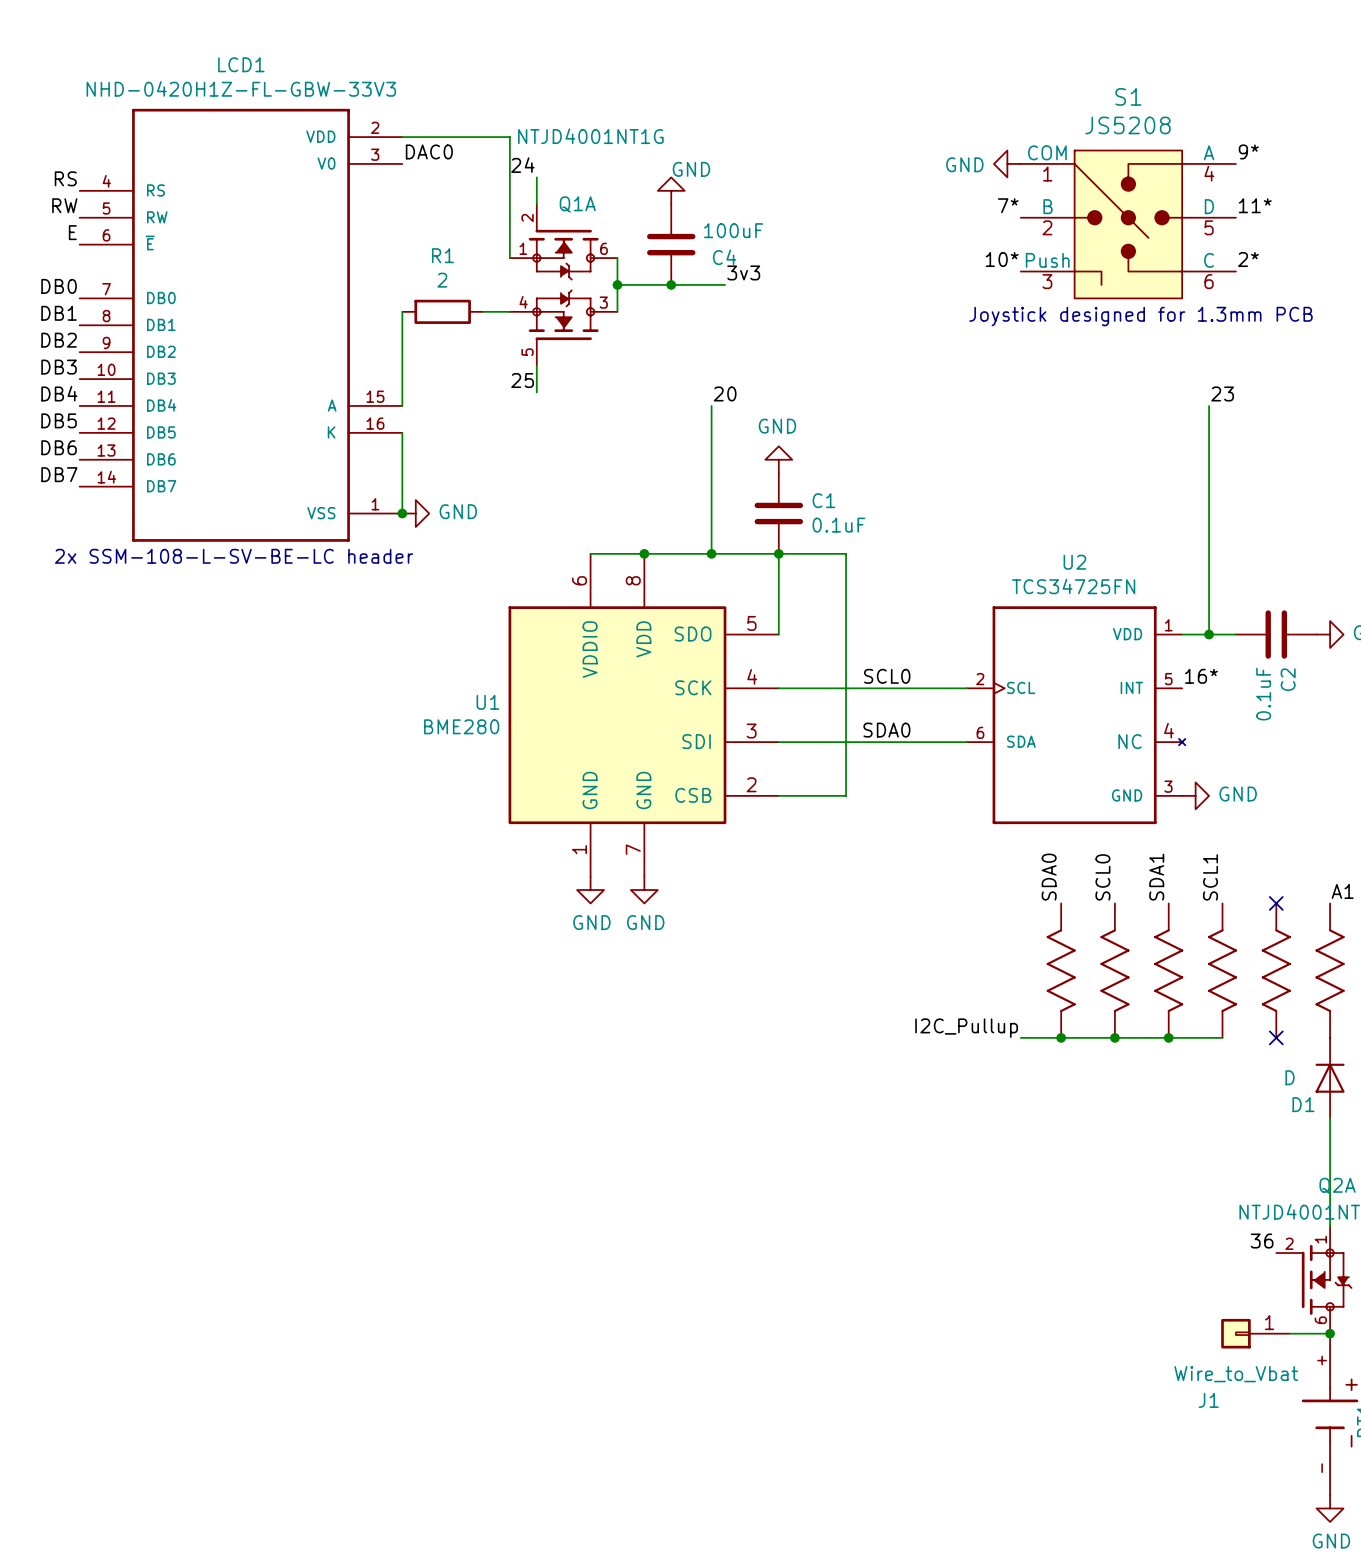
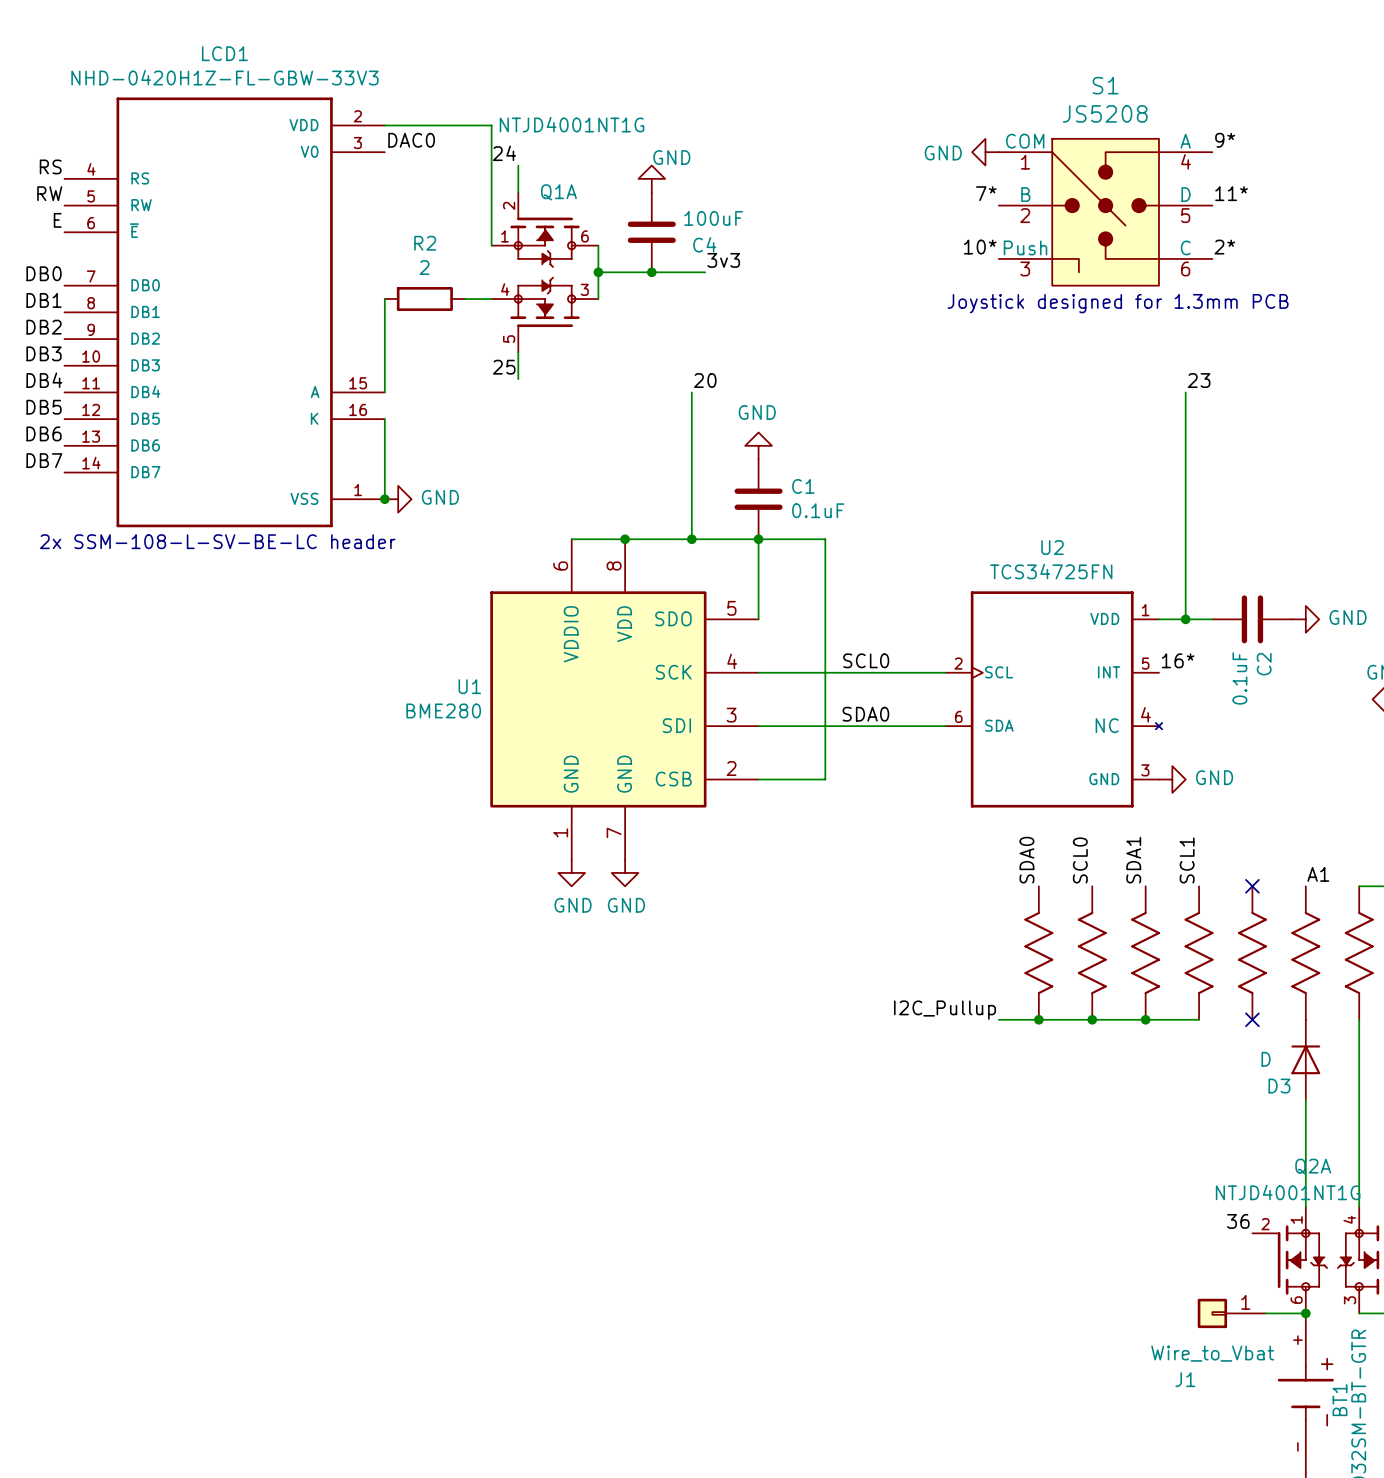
R1 name: R1 (443, 255) -> R2 (425, 243)
D1 name: D1 (1303, 1104) -> D3 (1279, 1086)

